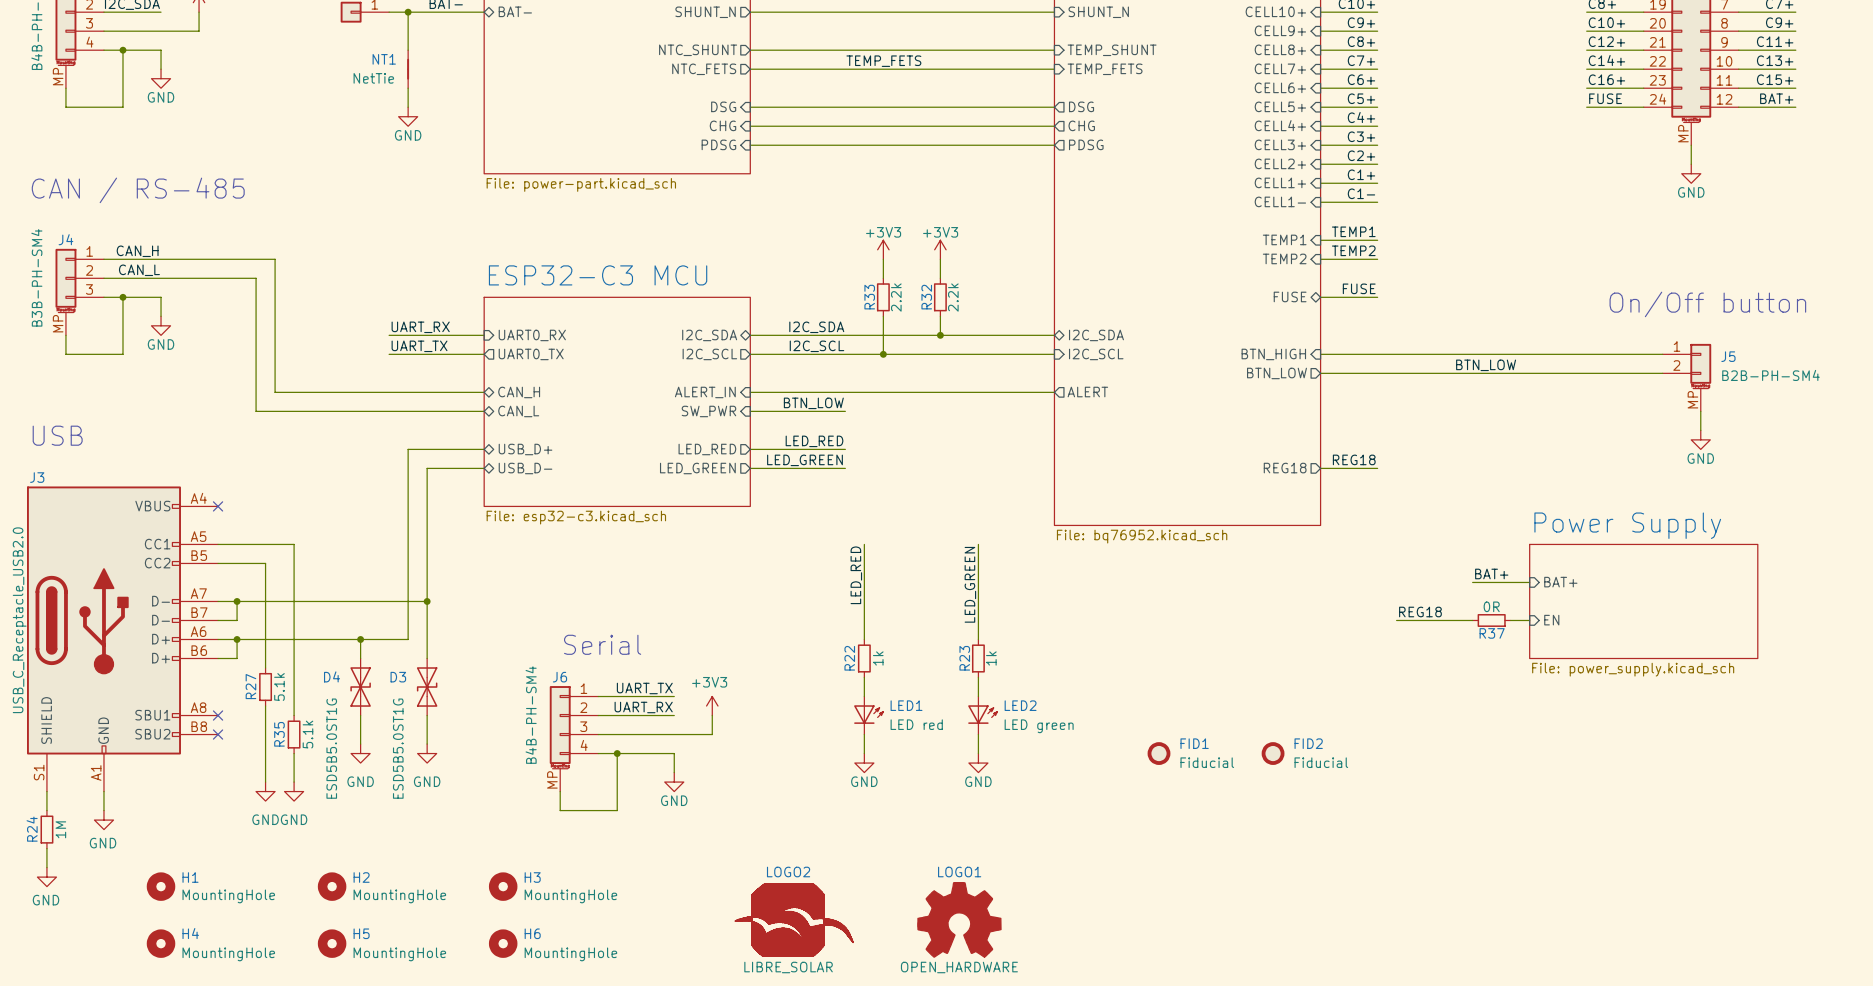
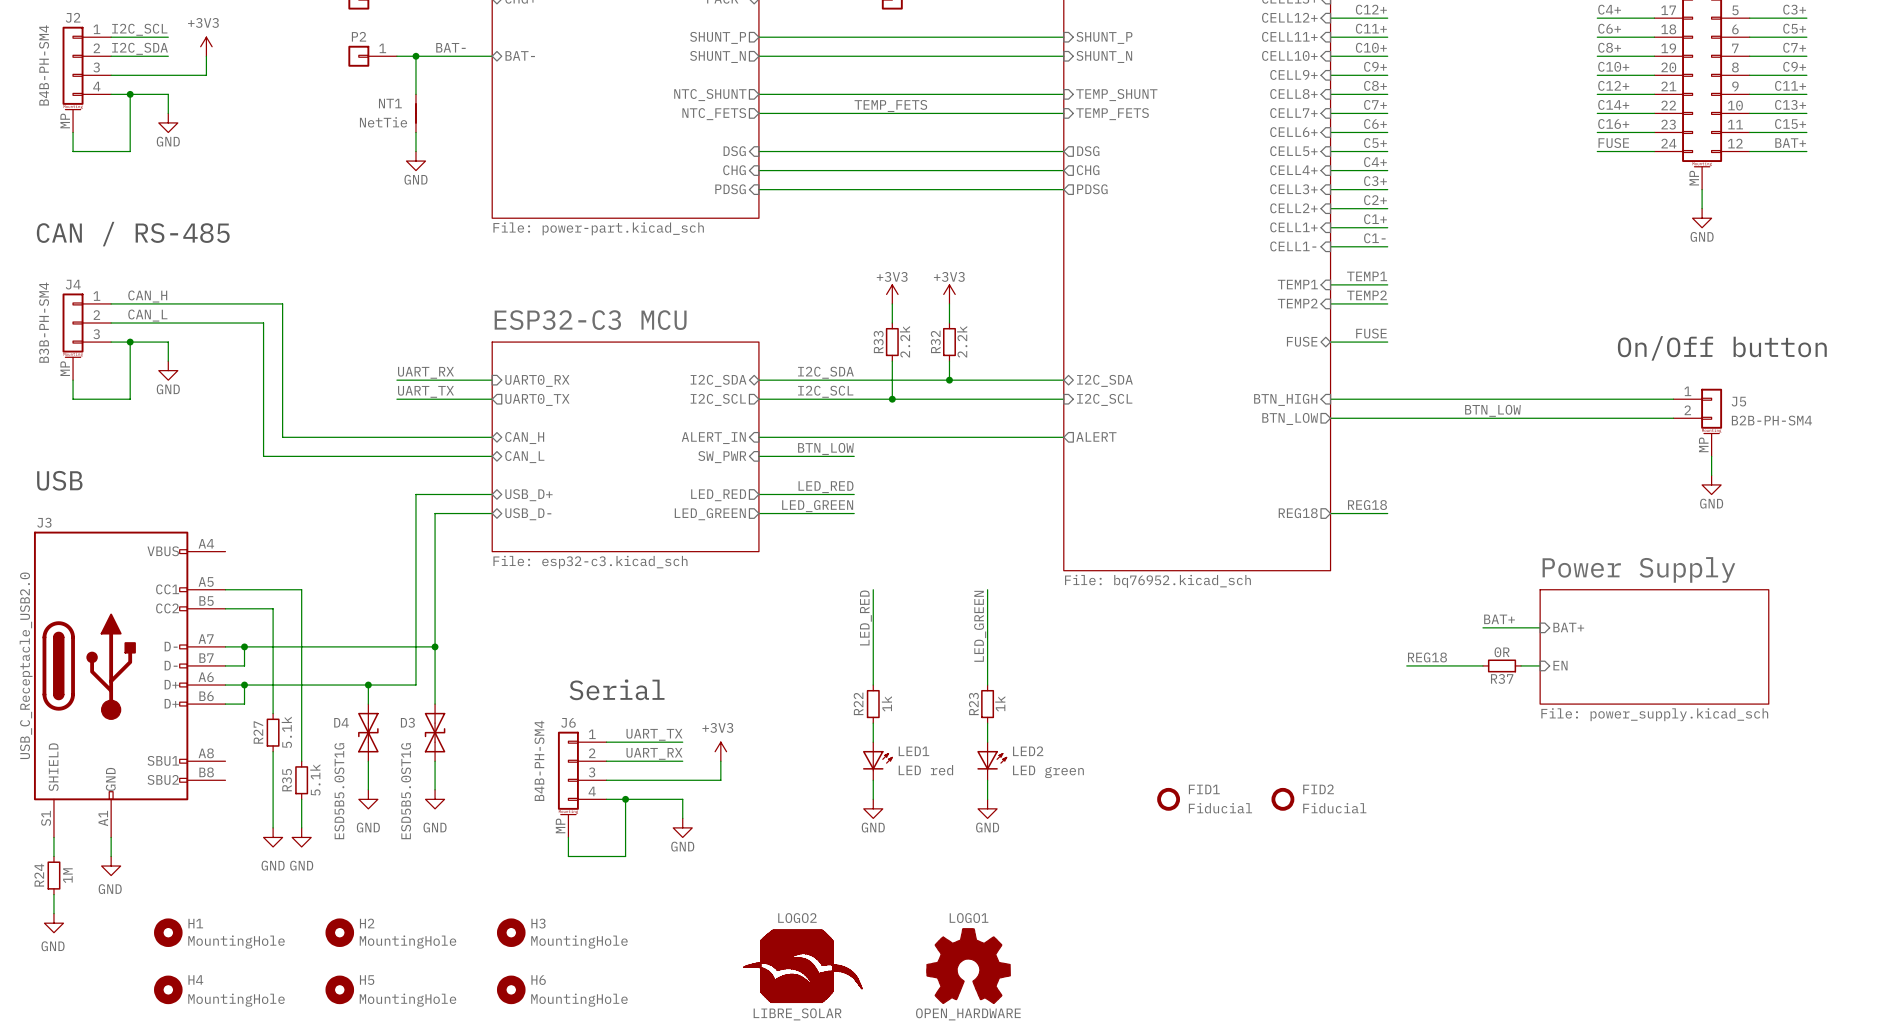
no-connect mark: (218, 506) -> none
no-connect mark: (218, 715) -> none
no-connect mark: (218, 734) -> none

